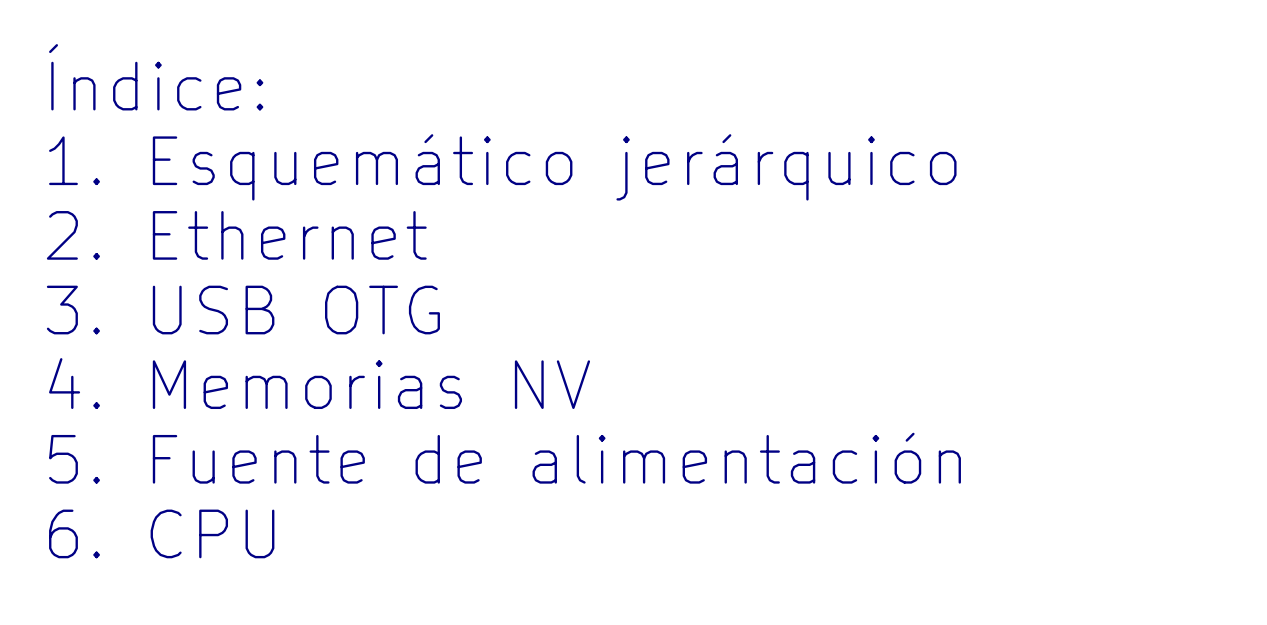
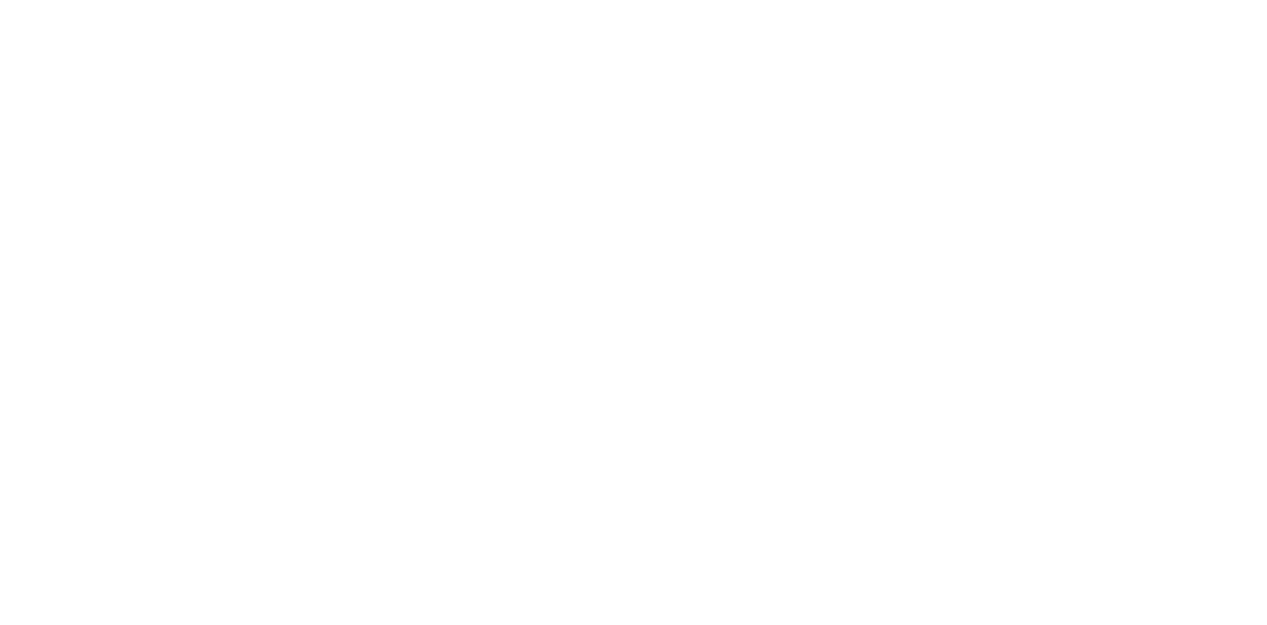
text: Índice: (156, 77) -> none
text: 1. Esquemático jerárquico (502, 167) -> none
text: 2. Ethernet (236, 235) -> none
text: 3. USB OTG (243, 310) -> none
text: 4. Memorias NV (319, 383) -> none
text: 5. Fuente de alimentación (505, 458) -> none
text: 6. CPU (161, 533) -> none

